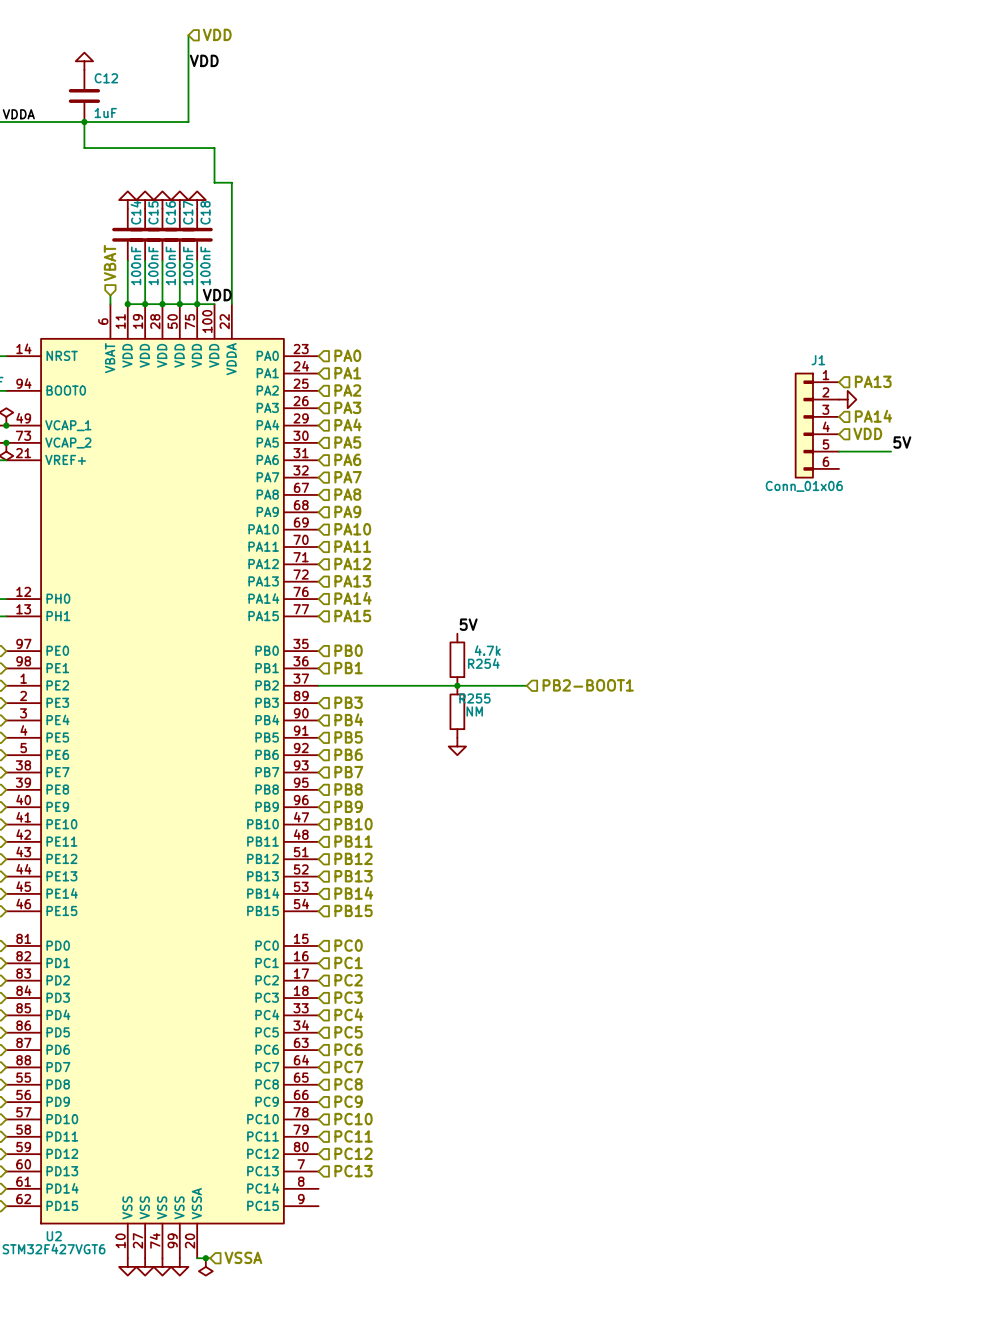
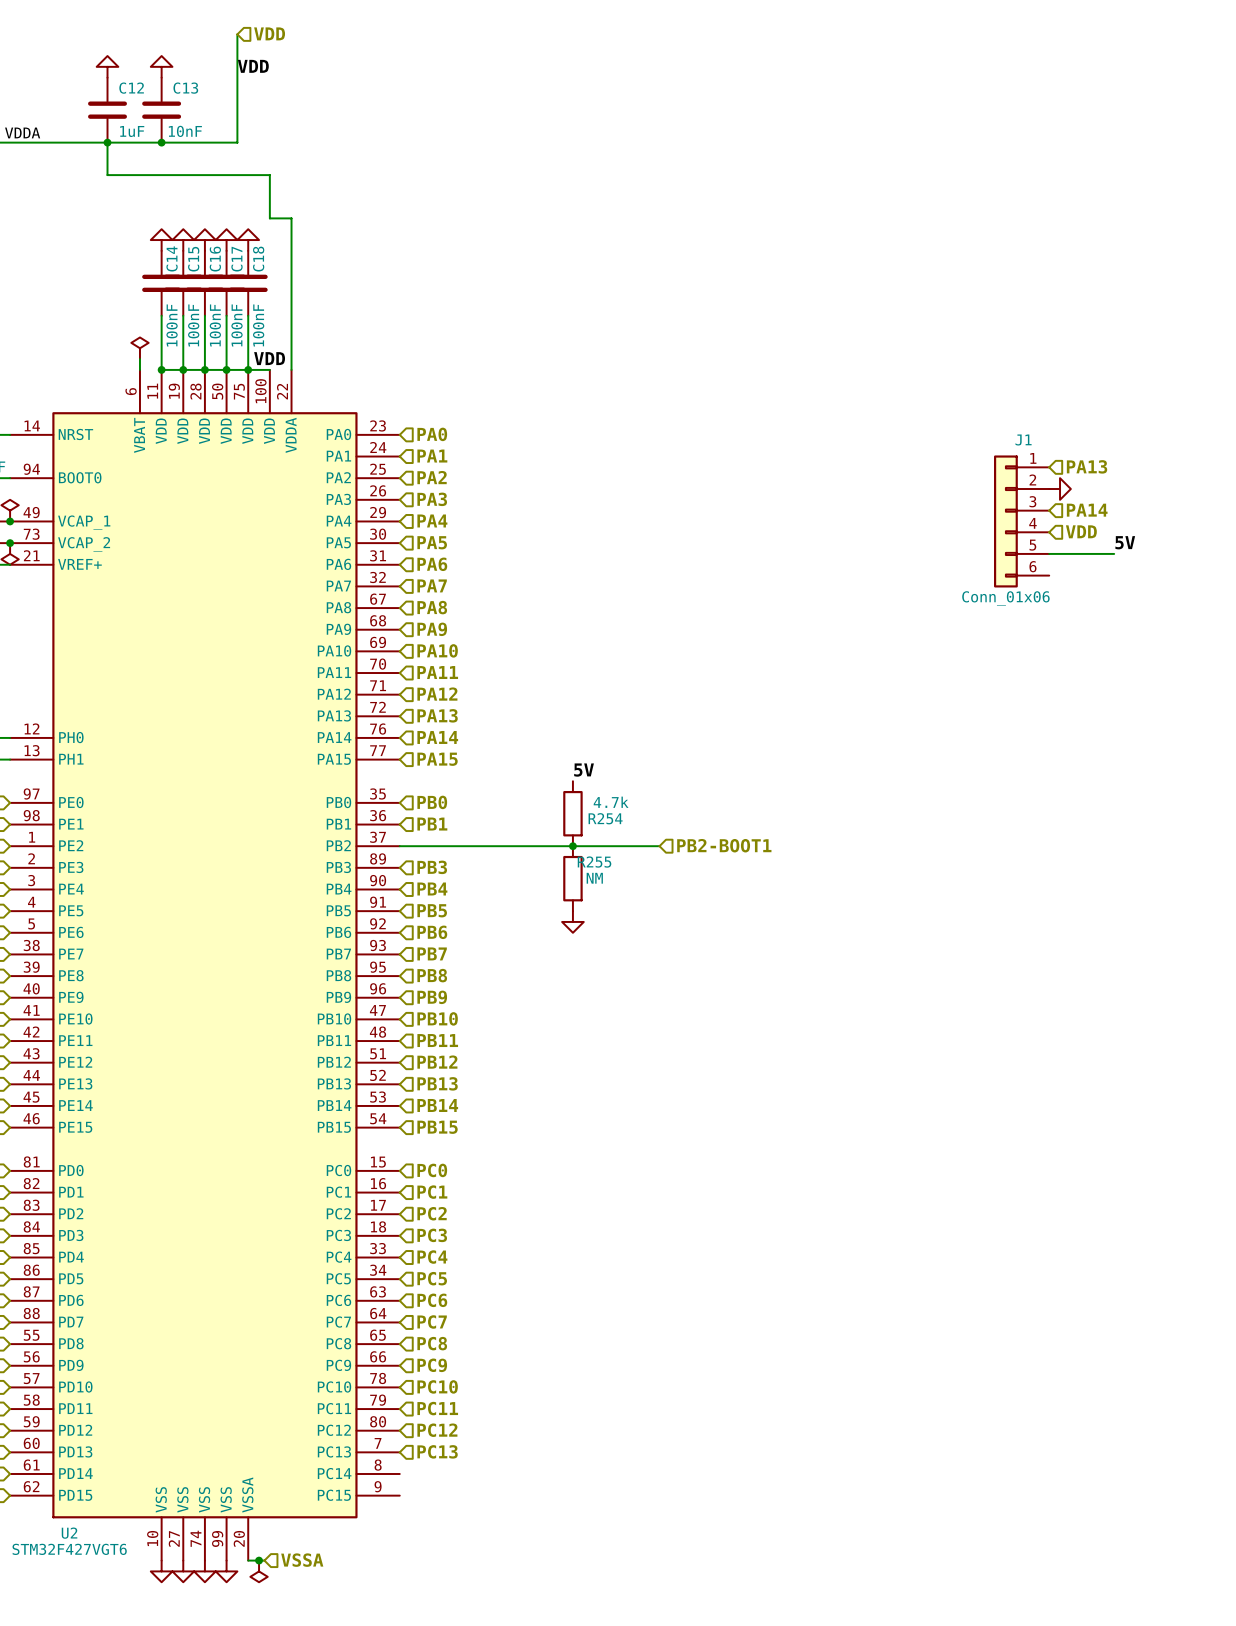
power symbol: none -> (161, 66)
C13: none -> 10nF (161, 110)
junction: none -> (161, 142)
hierarchical label: VBAT (110, 263) -> none
power symbol: none -> (139, 348)

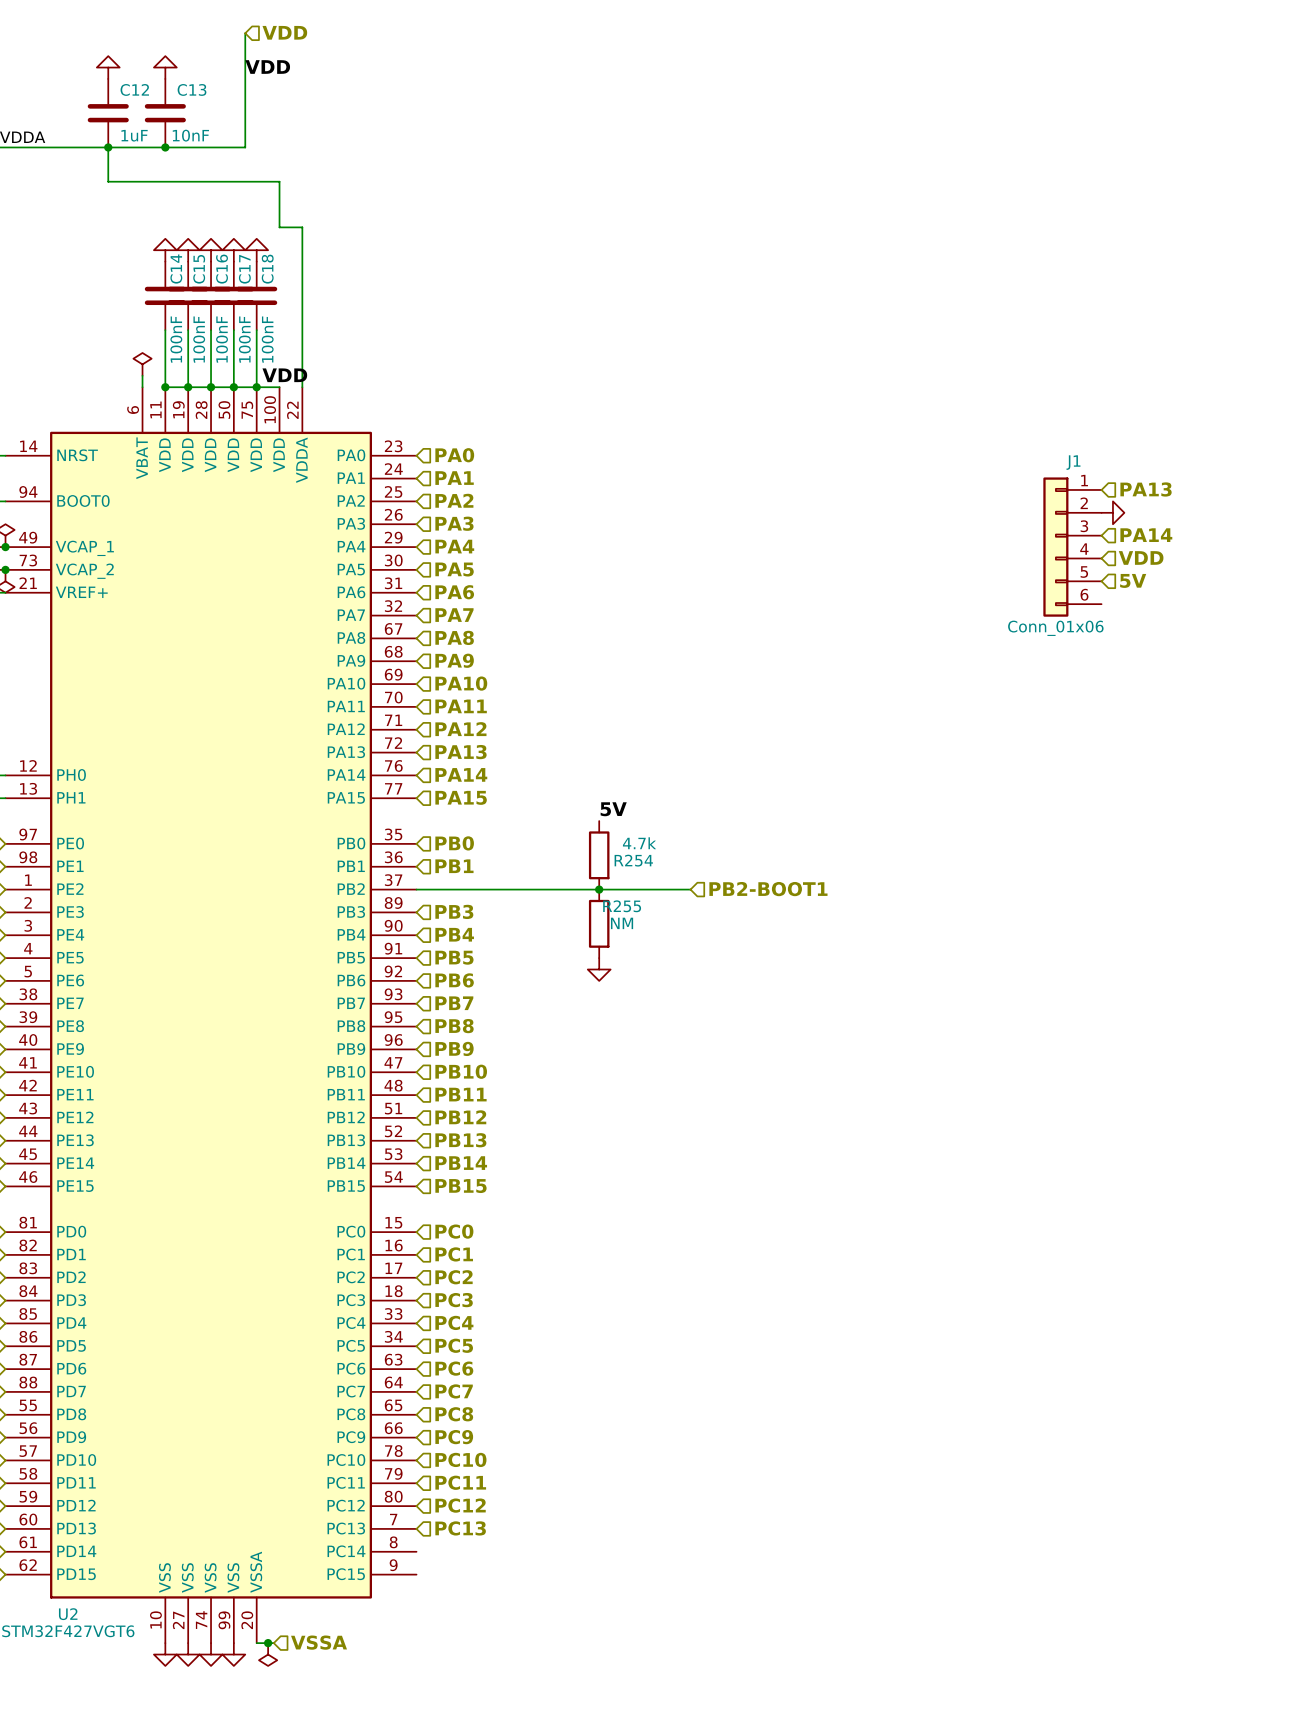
label: 5V (1125, 542) -> none
wire: (1049, 553) (1114, 553) -> none
hierarchical label: none -> 5V (1133, 580)

